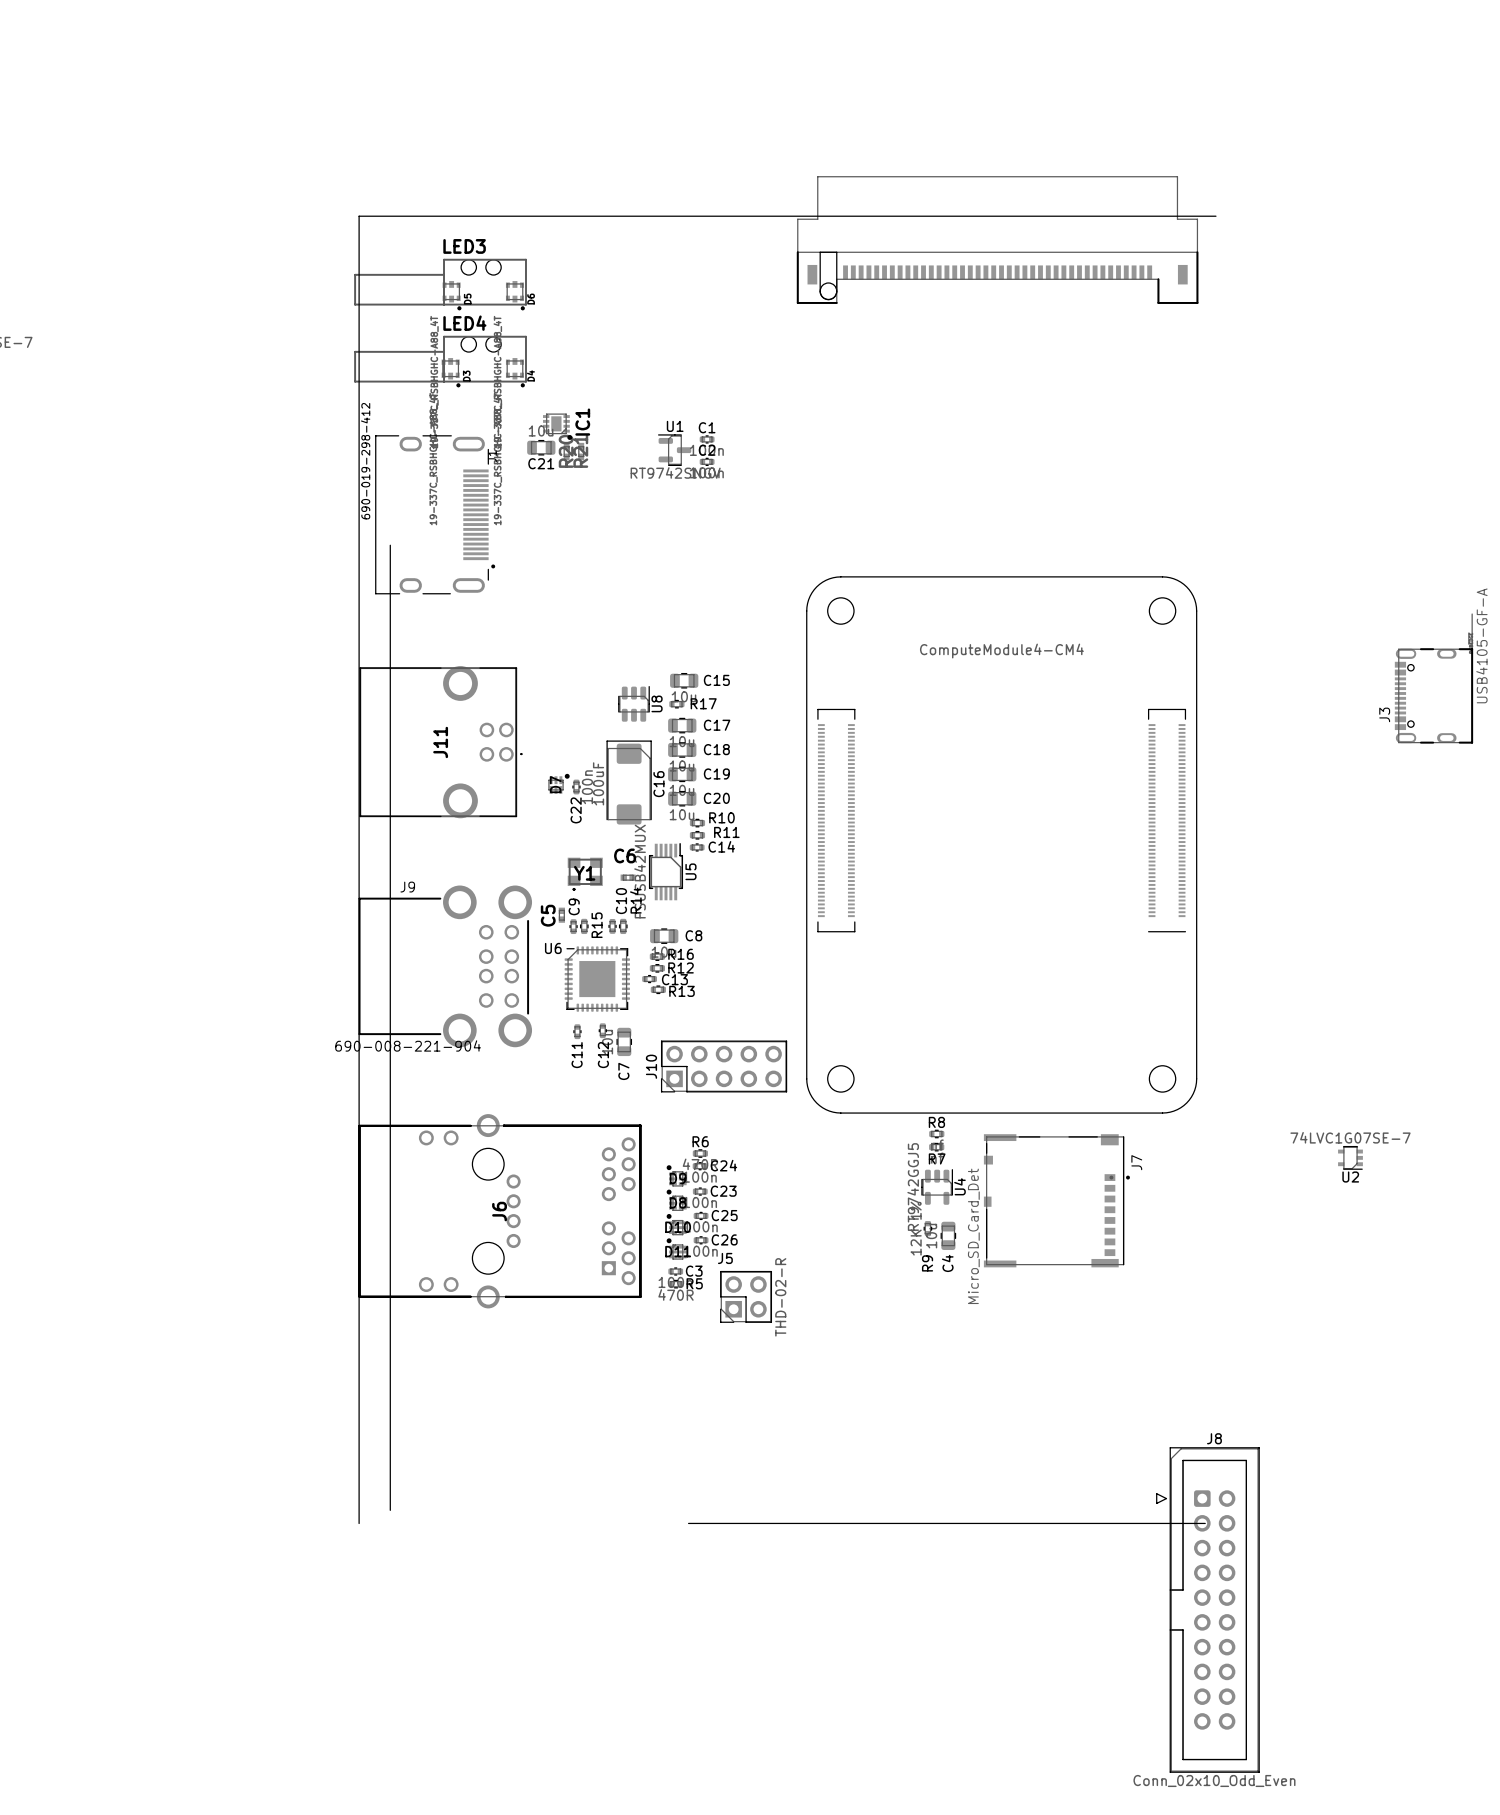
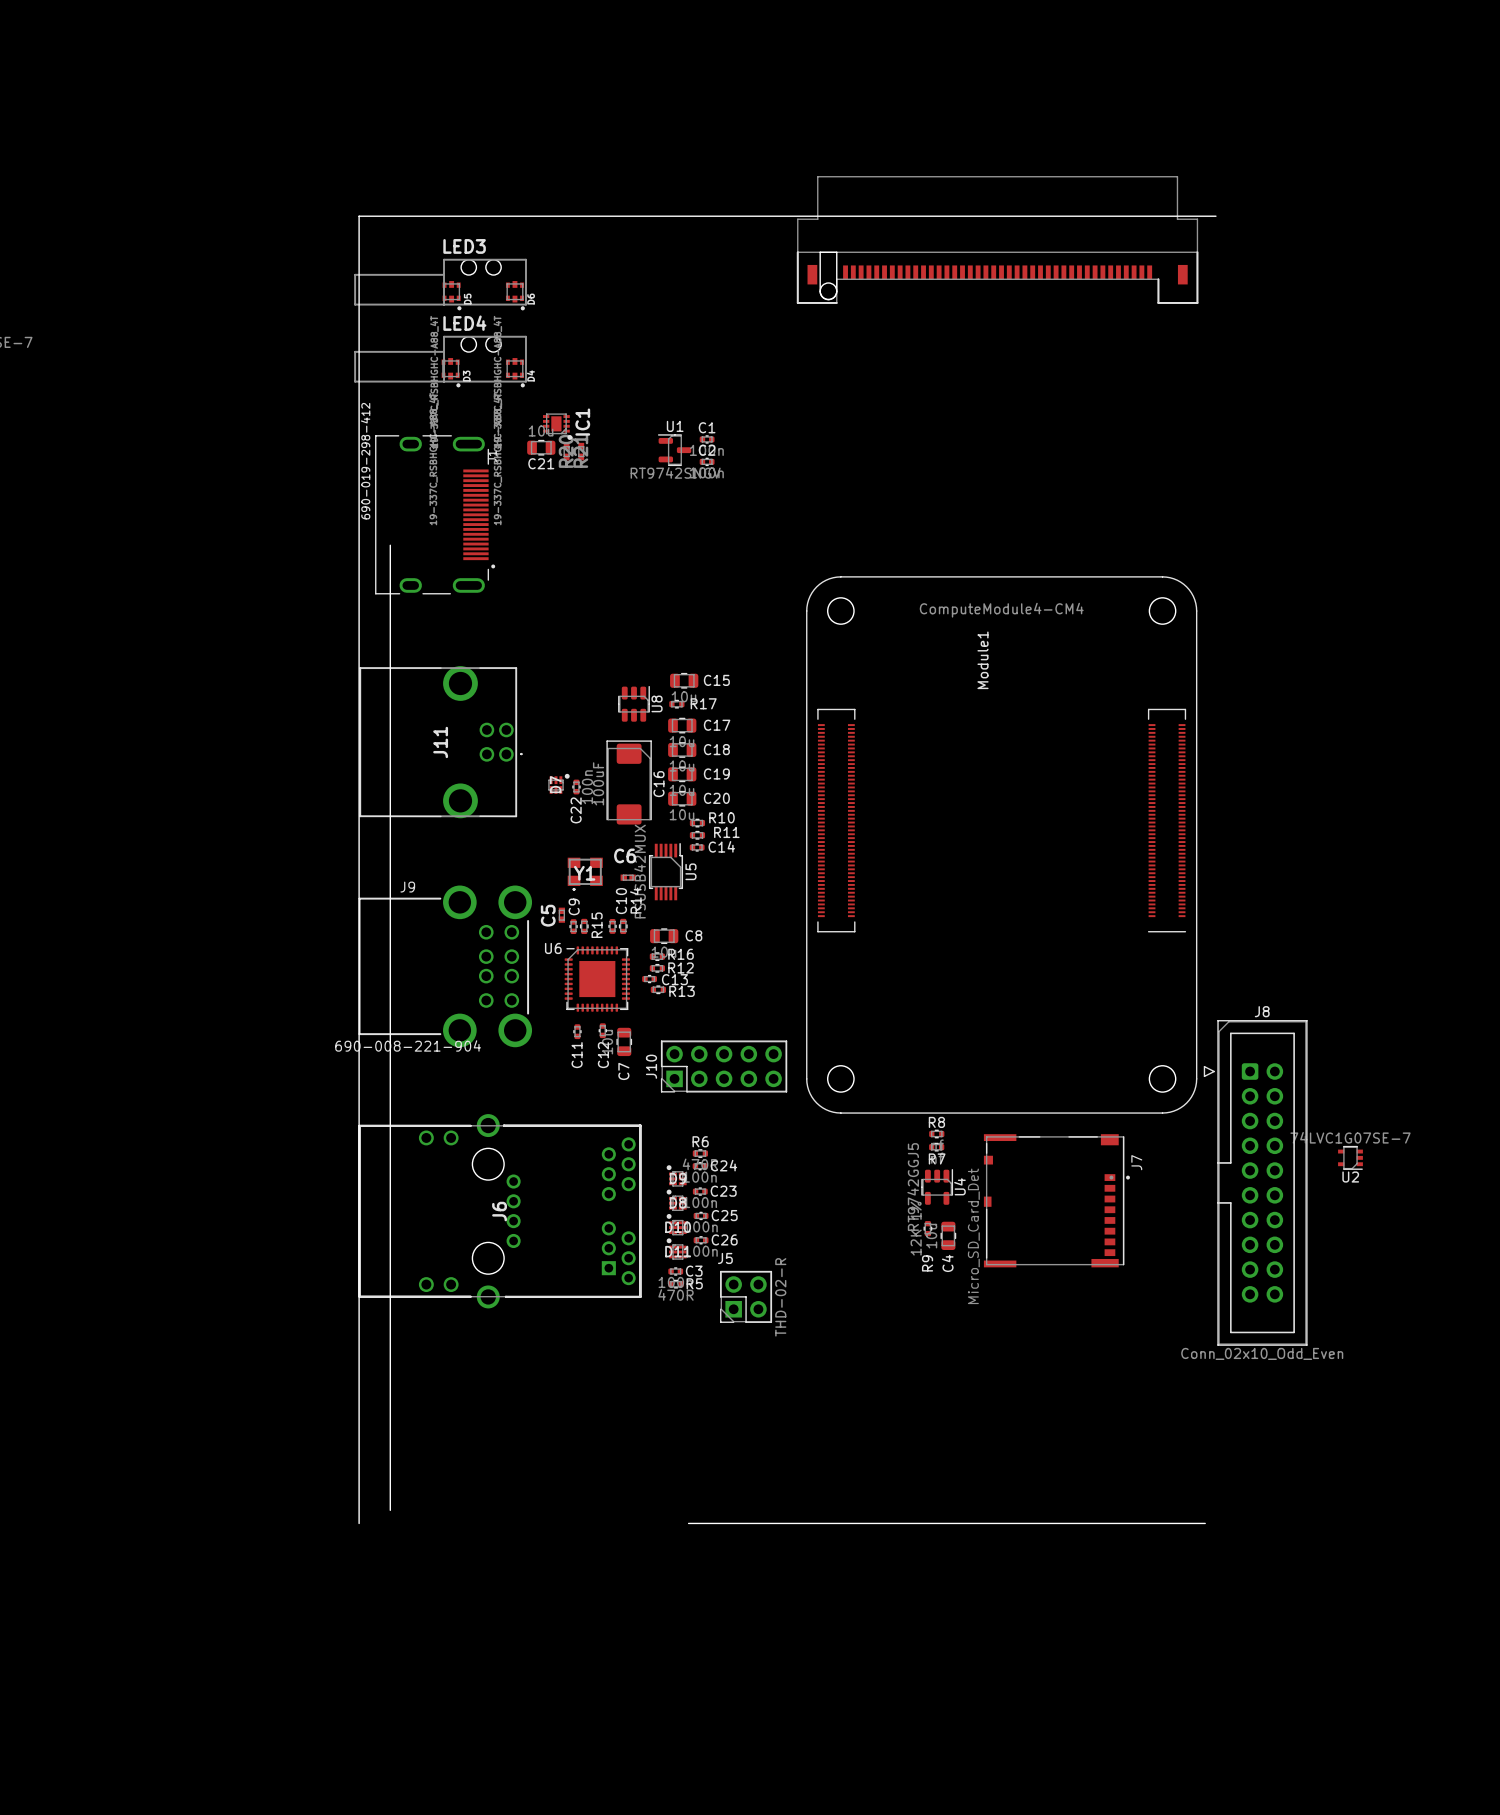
Module1 value position: ComputeModule4-CM4 (1001, 651) -> ComputeModule4-CM4 (1001, 610)
Module1 name: none -> Module1 (983, 660)
J3: USB4105-GF-A (1433, 678) -> none
J8 position: (1207, 1610) -> (1255, 1182)

